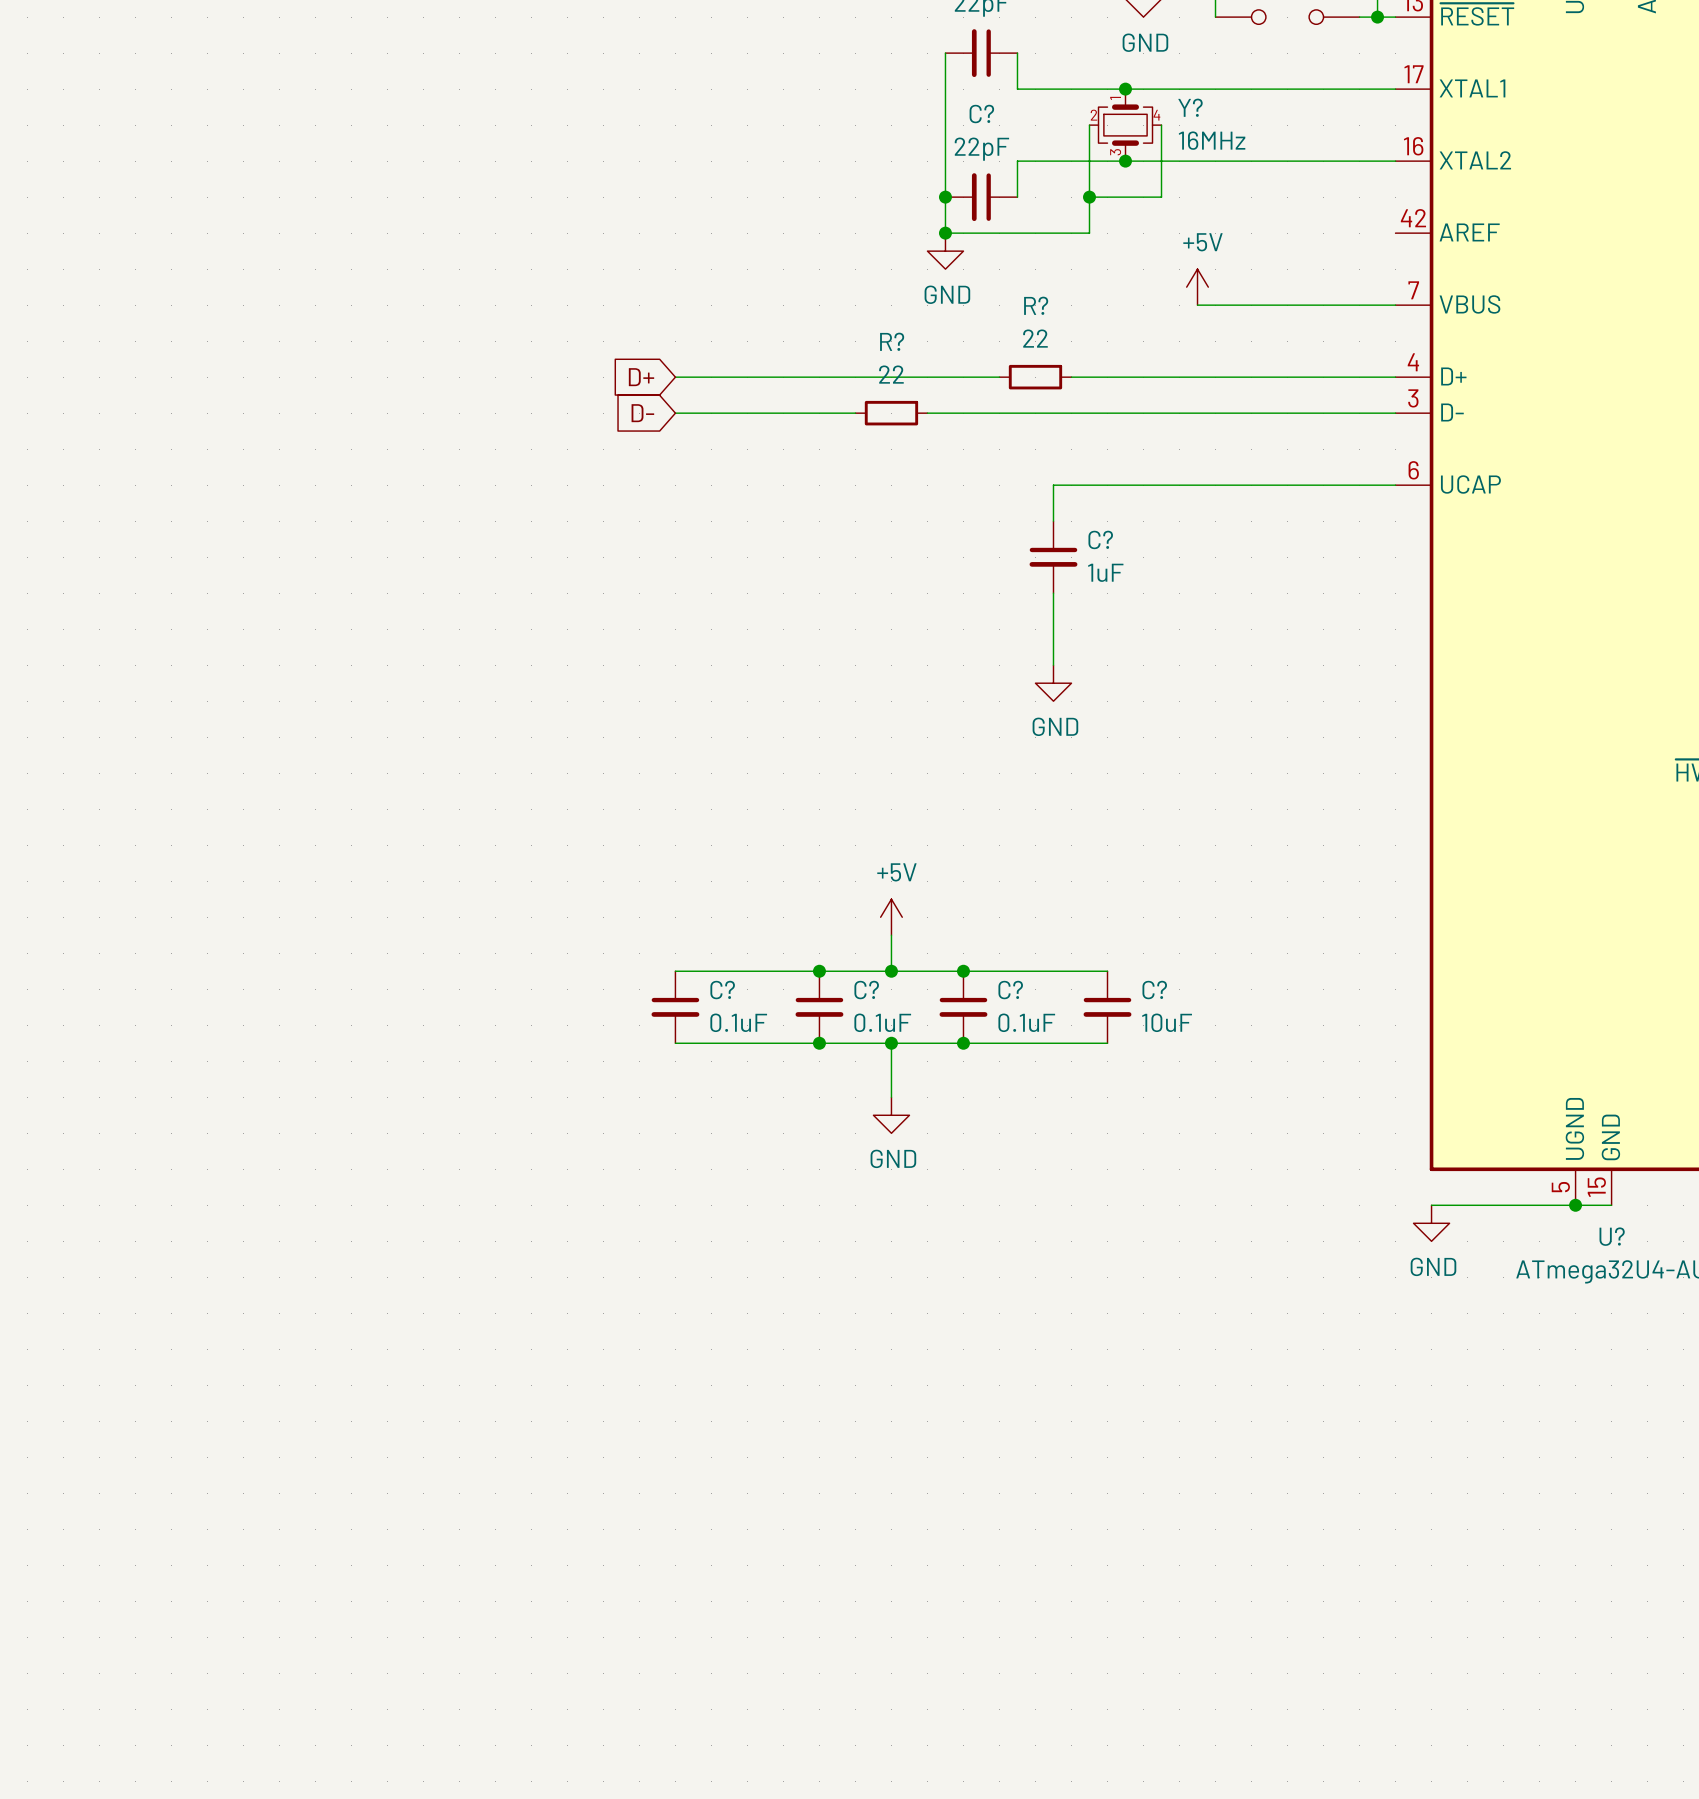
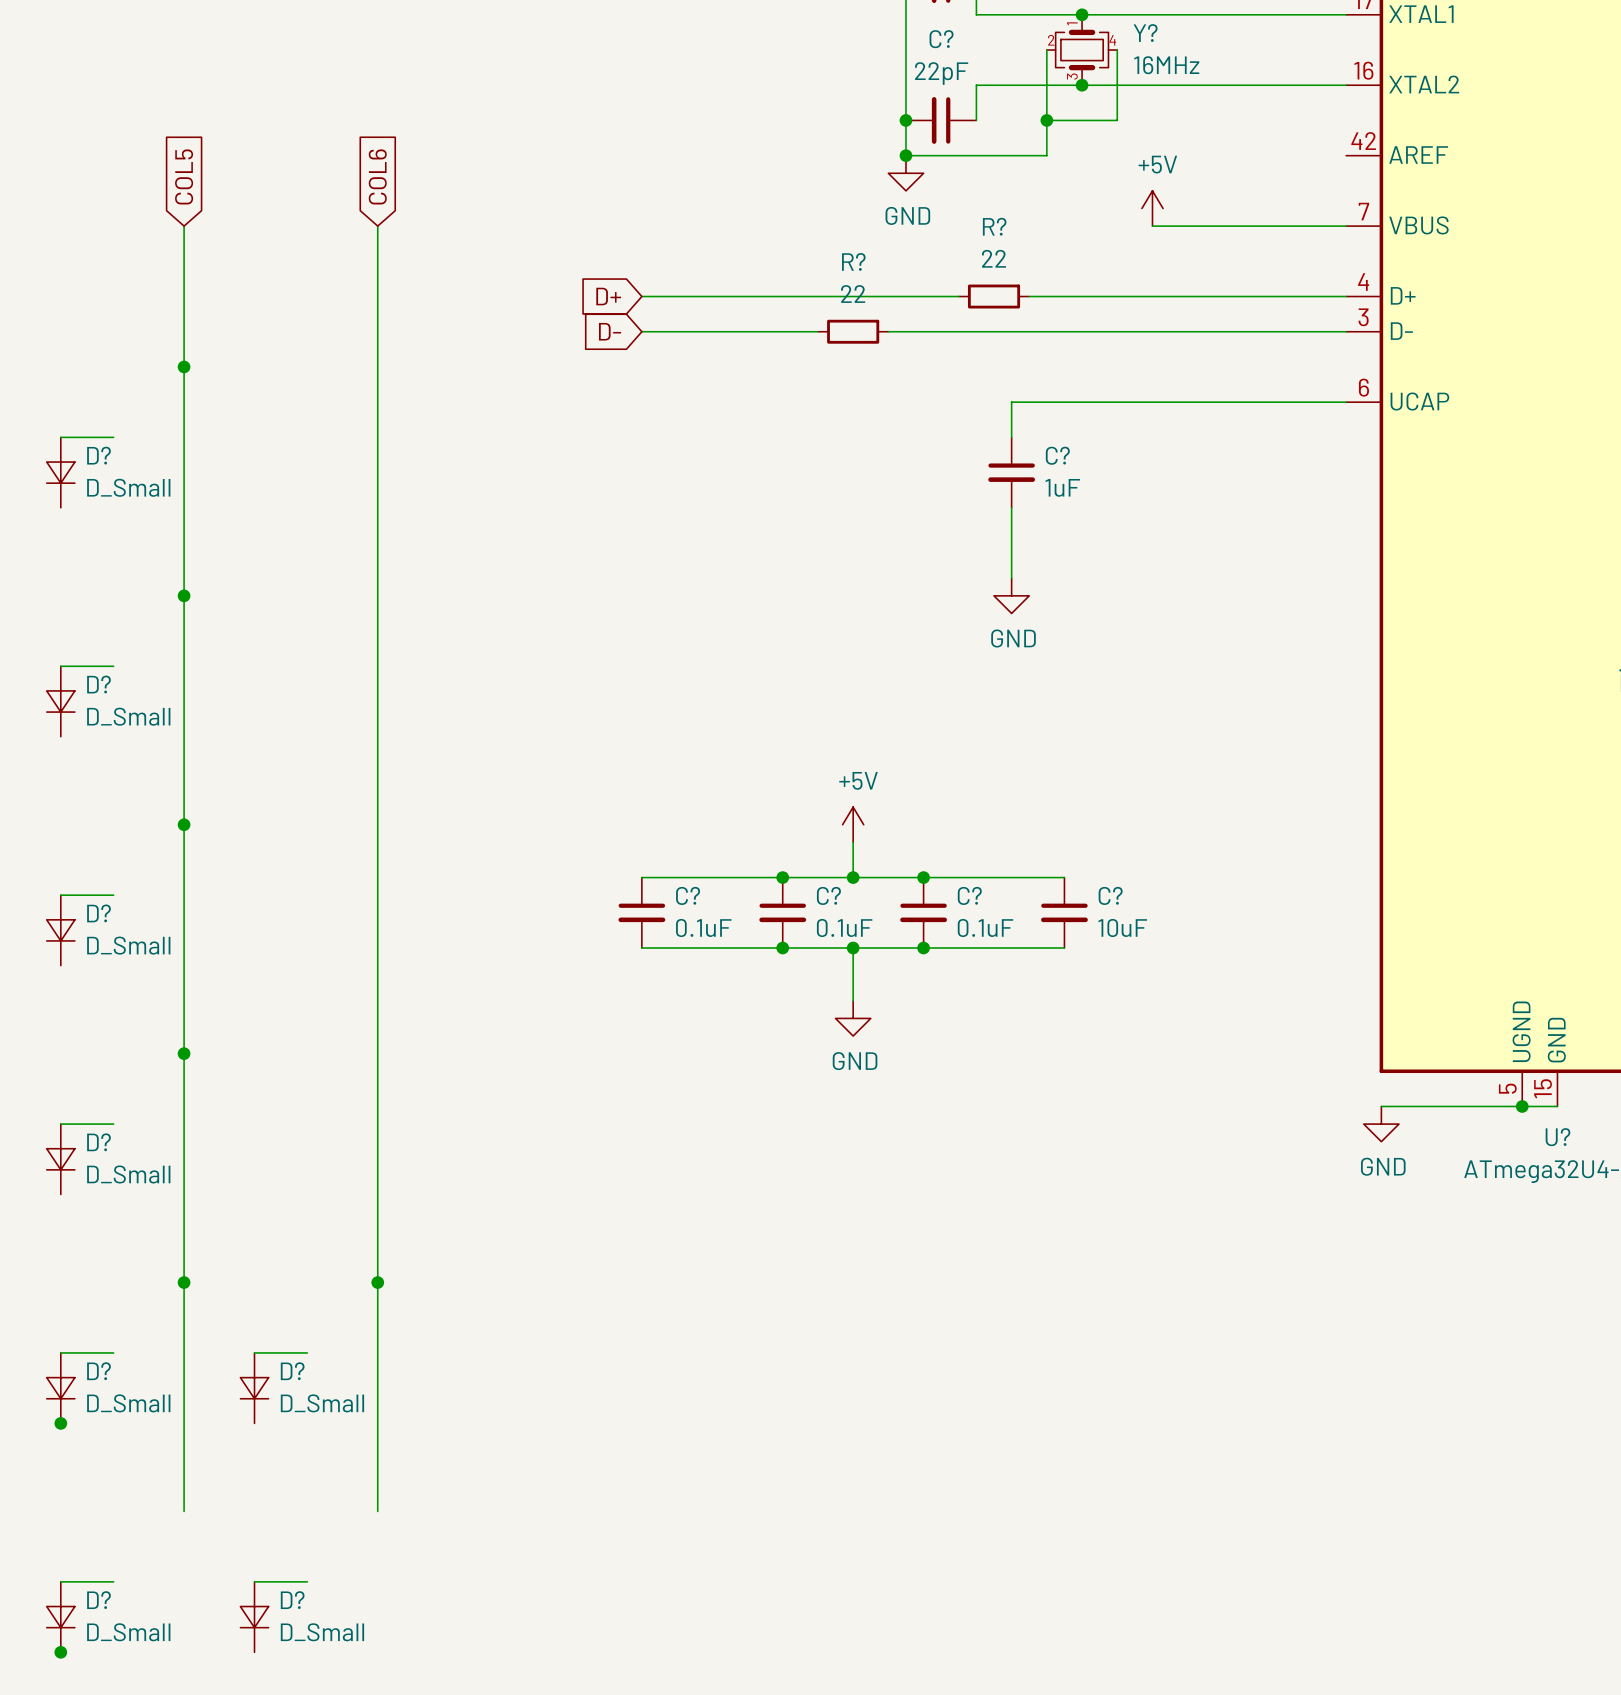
global label: none -> COL5 (184, 176)
global label: none -> COL6 (377, 176)
wire: none -> (184, 226) (184, 1511)
wire: none -> (377, 226) (377, 1511)
junction: none -> (184, 366)
wire: none -> (60, 437) (113, 437)
D?: none -> D_Small (60, 472)
junction: none -> (184, 595)
wire: none -> (60, 666) (113, 666)
D?: none -> D_Small (60, 701)
junction: none -> (184, 824)
wire: none -> (60, 895) (113, 895)
D?: none -> D_Small (60, 930)
junction: none -> (184, 1053)
wire: none -> (60, 1124) (113, 1124)
D?: none -> D_Small (60, 1159)
junction: none -> (184, 1282)
junction: none -> (377, 1282)
wire: none -> (60, 1352) (113, 1352)
wire: none -> (254, 1352) (307, 1352)
D?: none -> D_Small (60, 1388)
D?: none -> D_Small (254, 1388)
junction: none -> (60, 1423)
wire: none -> (60, 1581) (113, 1581)
wire: none -> (254, 1581) (307, 1581)
D?: none -> D_Small (60, 1617)
D?: none -> D_Small (254, 1617)
junction: none -> (60, 1652)

